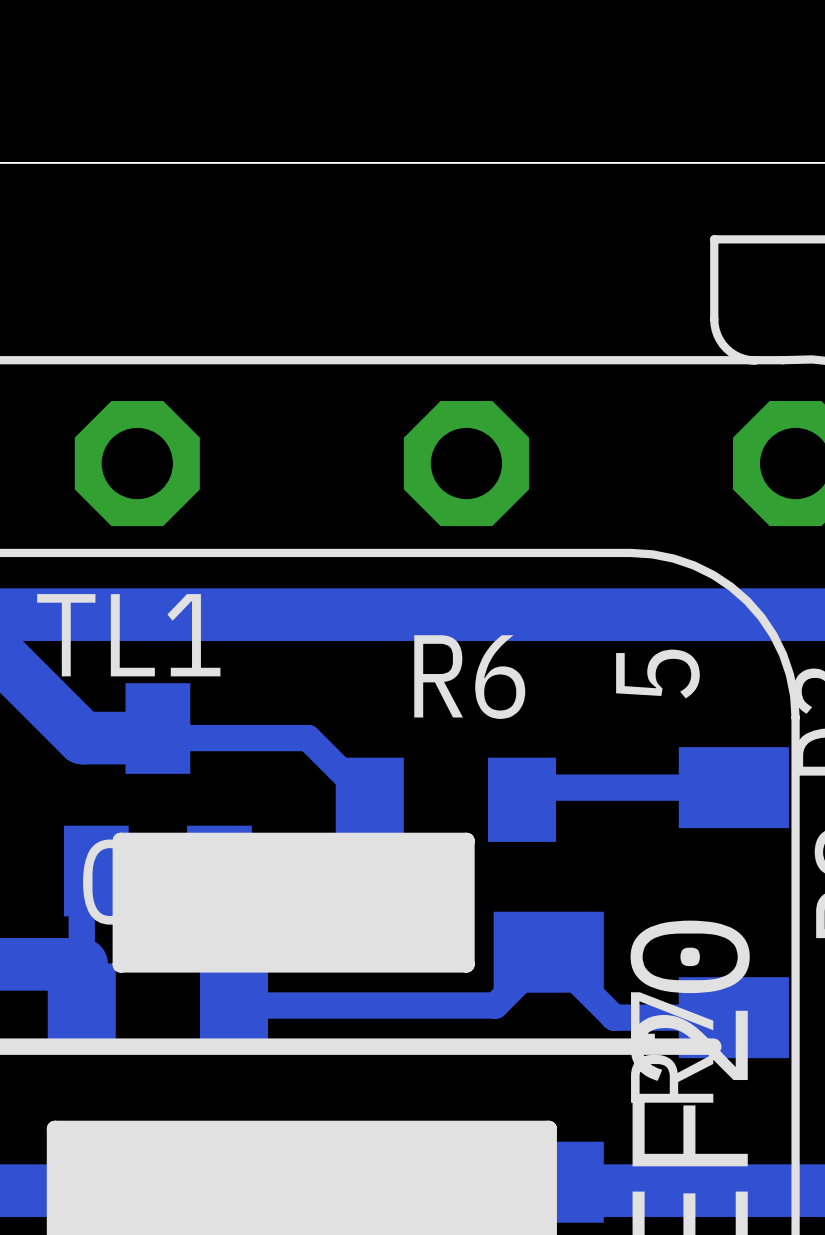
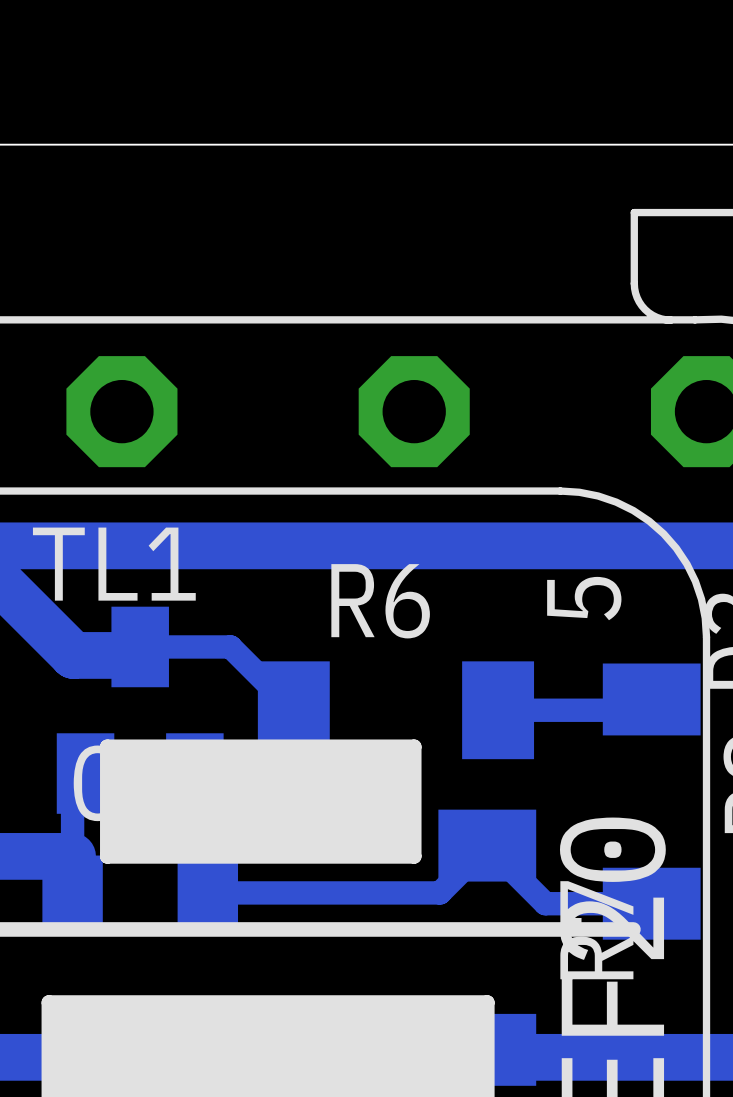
R6 name position: R6 (469, 677) -> R6 (380, 601)
bottom track: none -> (140, 646) (230, 646) (293, 710)
bottom track: (148, 738) (308, 738) (369, 799) -> none
R6 footprint: [335, 757, 557, 842] -> [257, 661, 535, 760]
bottom track: (733, 787) (534, 787) (522, 799) -> none
bottom track: none -> (640, 710) (498, 710)

